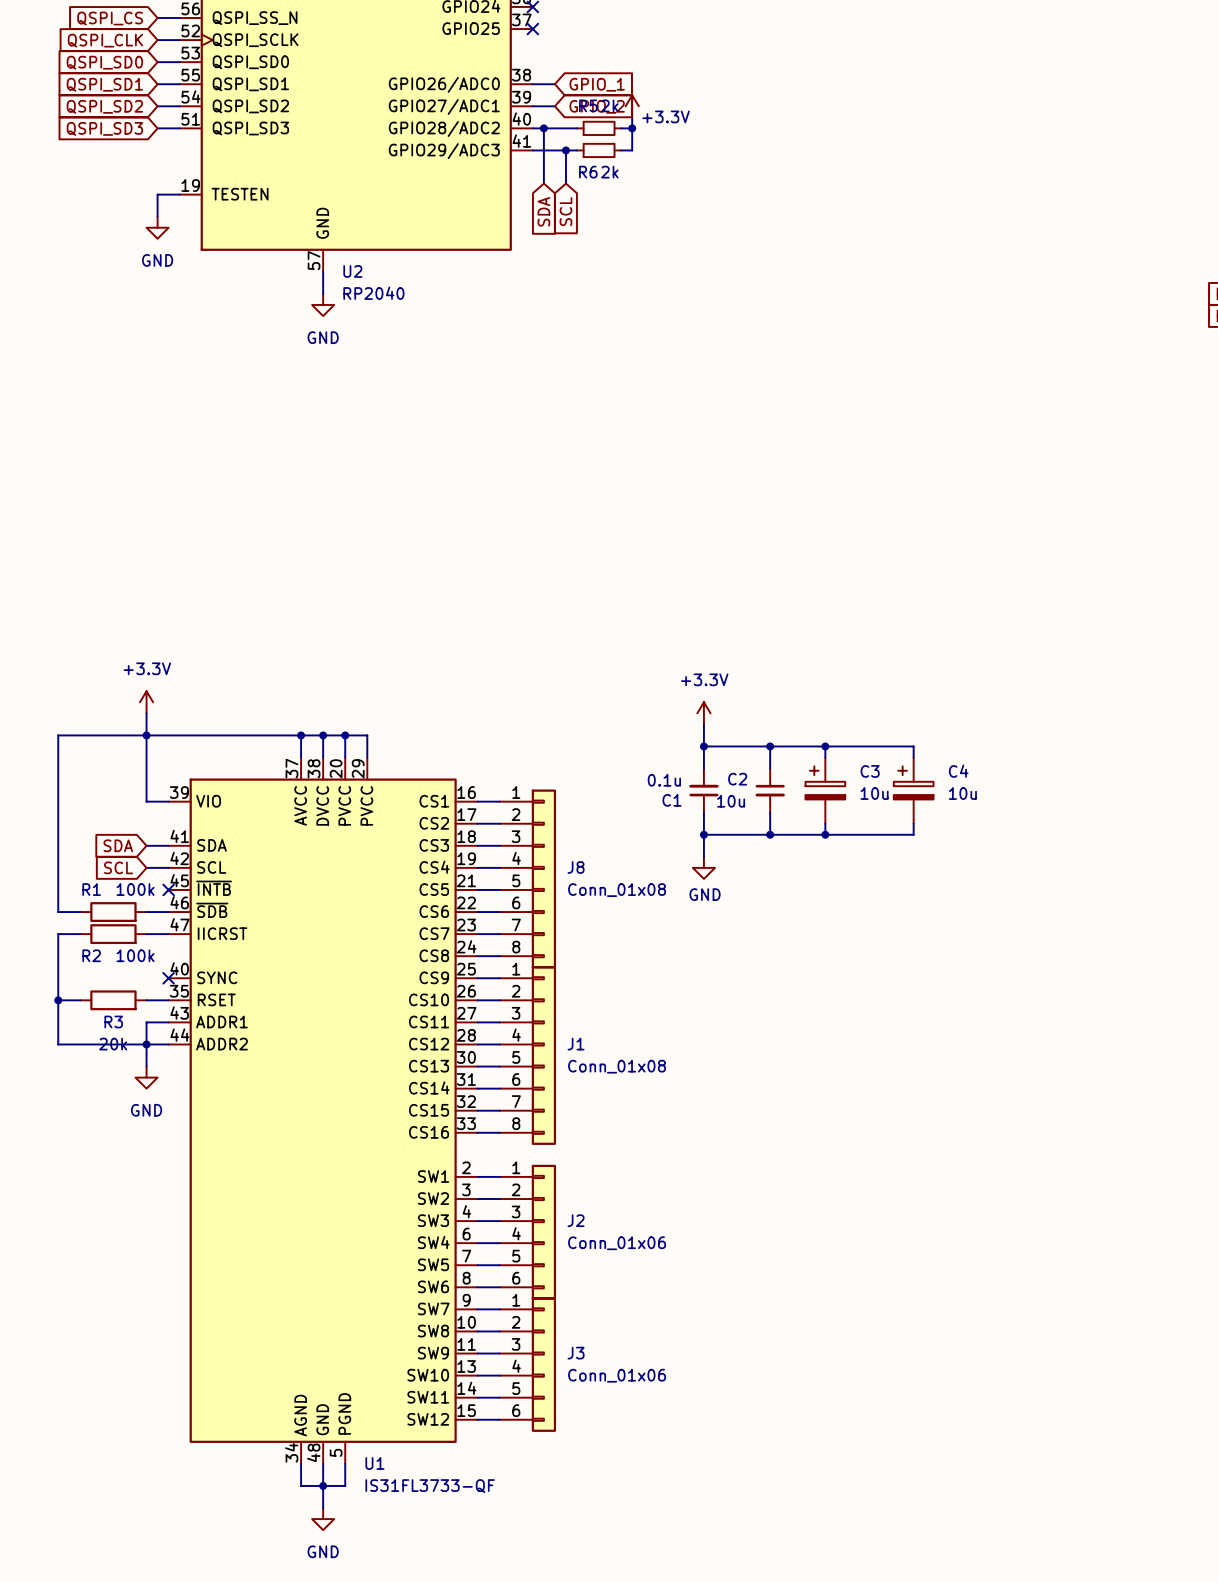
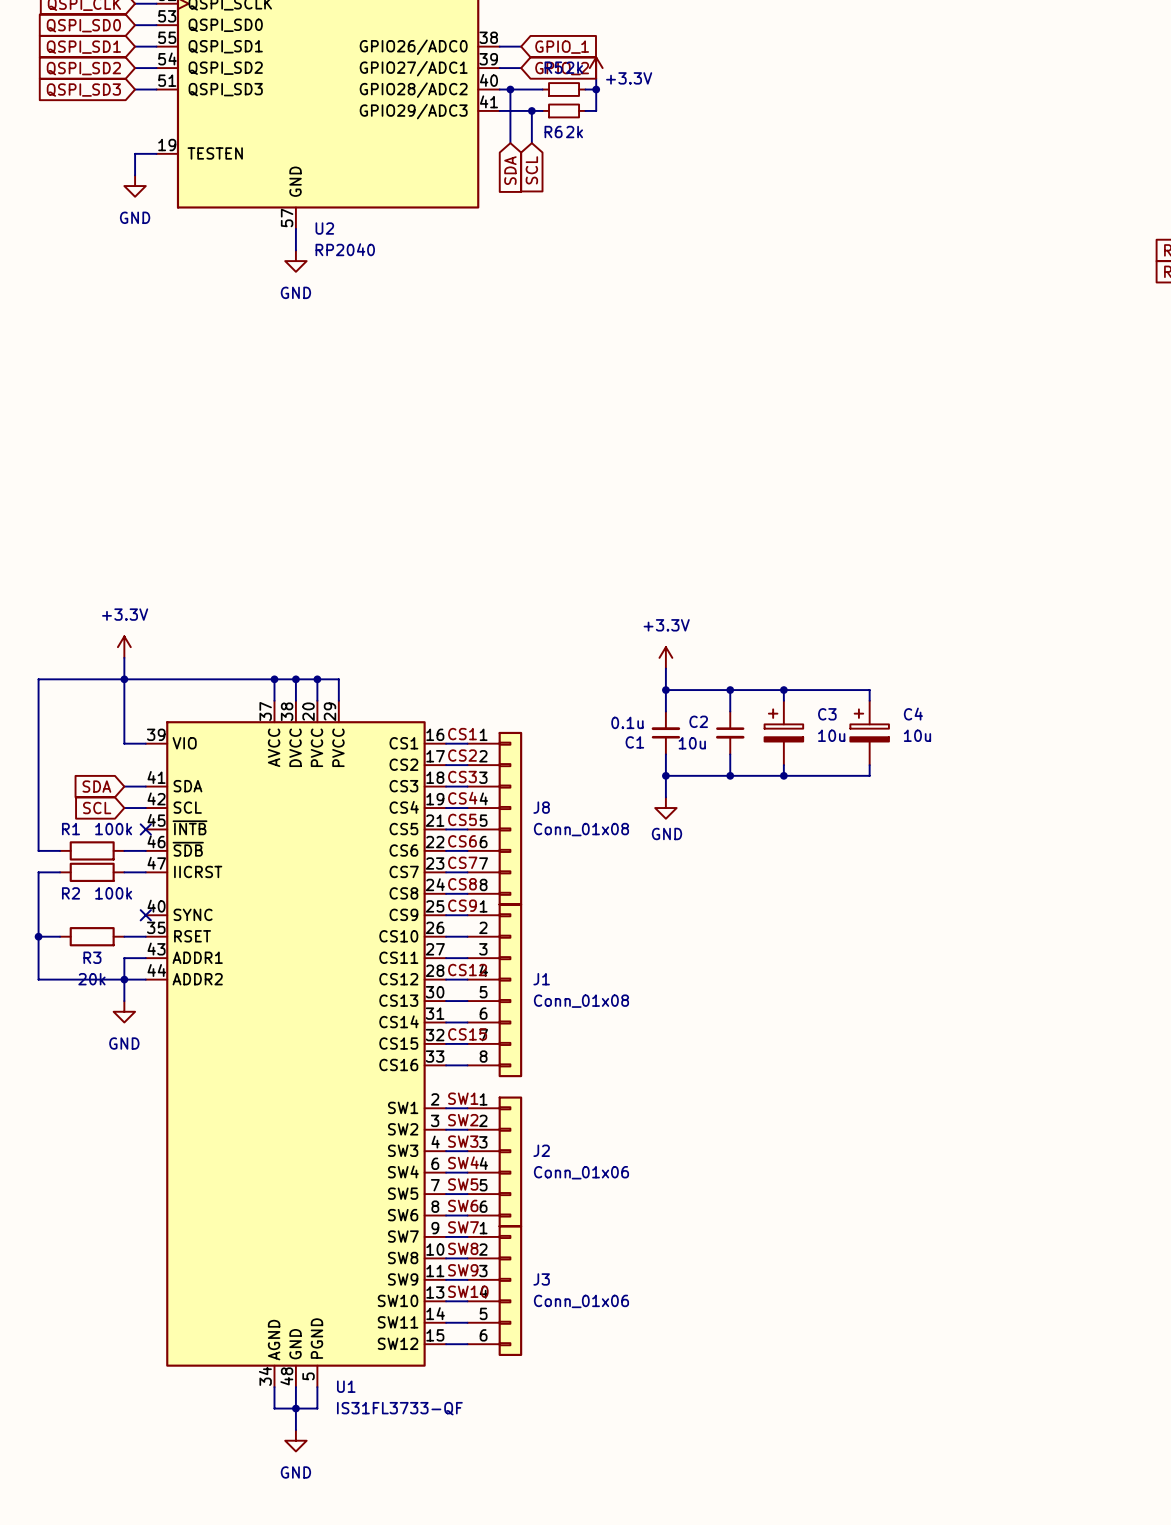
label: none -> CS1 (462, 734)
label: none -> CS2 (462, 755)
label: none -> CS3 (462, 777)
label: none -> CS4 (462, 798)
label: none -> CS5 (462, 819)
label: none -> CS6 (462, 841)
label: none -> CS7 (462, 862)
label: none -> CS8 (462, 884)
label: none -> CS9 (462, 905)
label: none -> CS12 (467, 970)
label: none -> CS15 (467, 1034)
label: none -> SW1 (463, 1098)
label: none -> SW2 (463, 1120)
label: none -> SW3 (463, 1141)
label: none -> SW4 (463, 1162)
label: none -> SW5 (463, 1184)
label: none -> SW6 (463, 1205)
label: none -> SW7 (463, 1227)
label: none -> SW8 (463, 1248)
label: none -> SW9 (463, 1270)
label: none -> SW10 (468, 1291)

